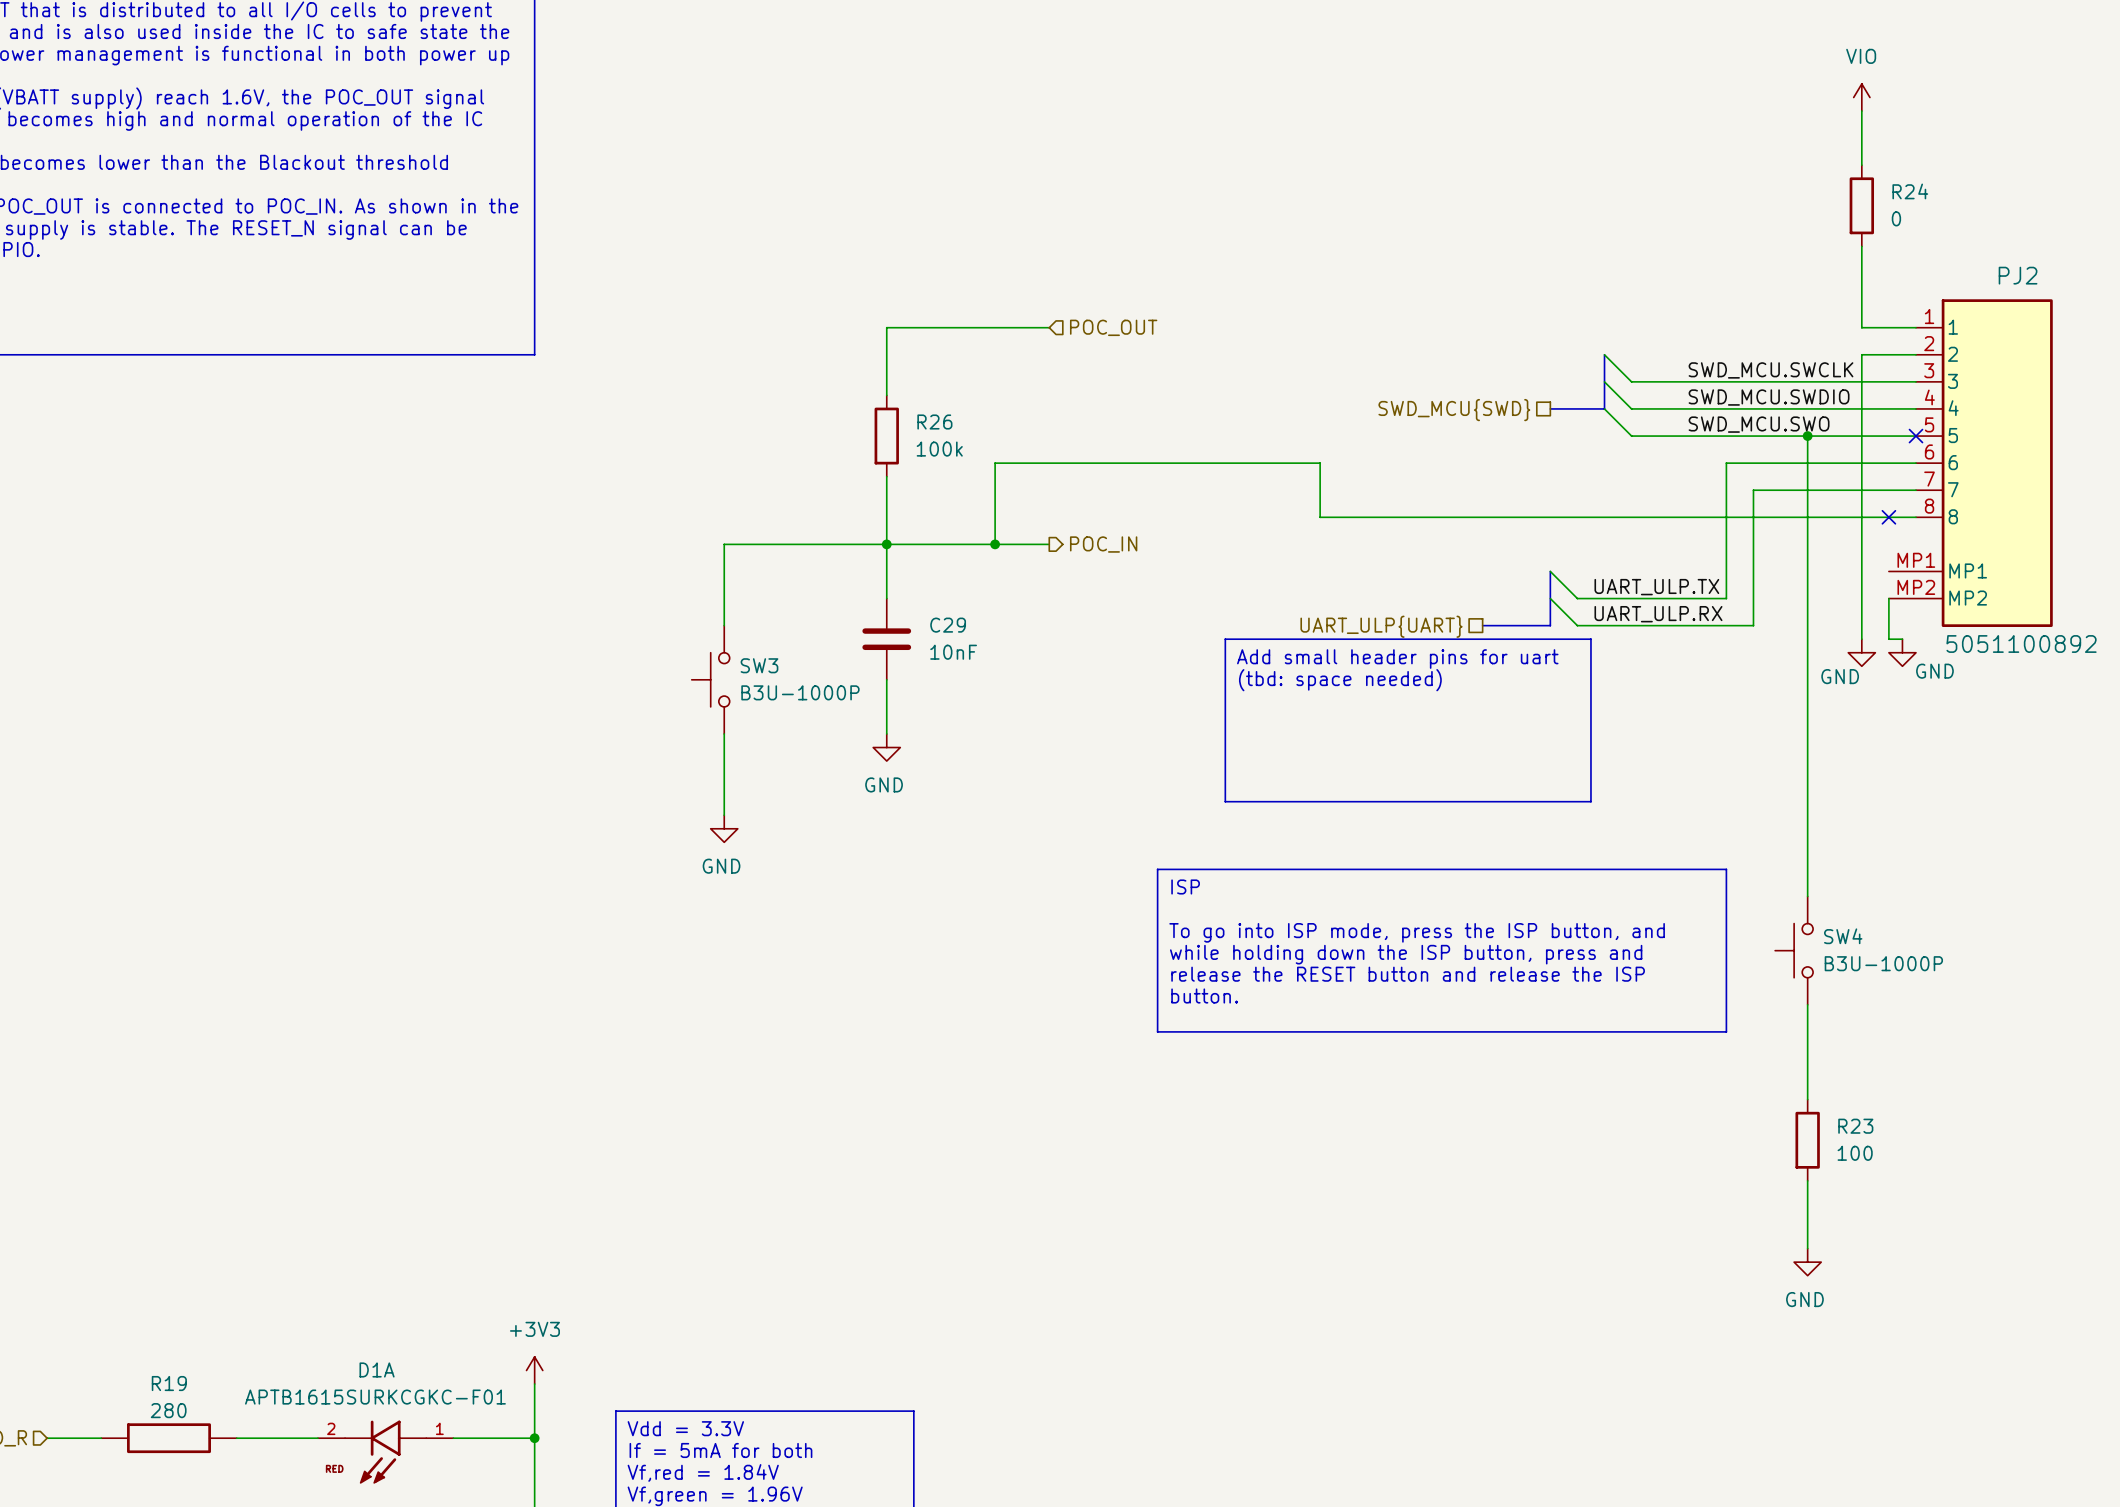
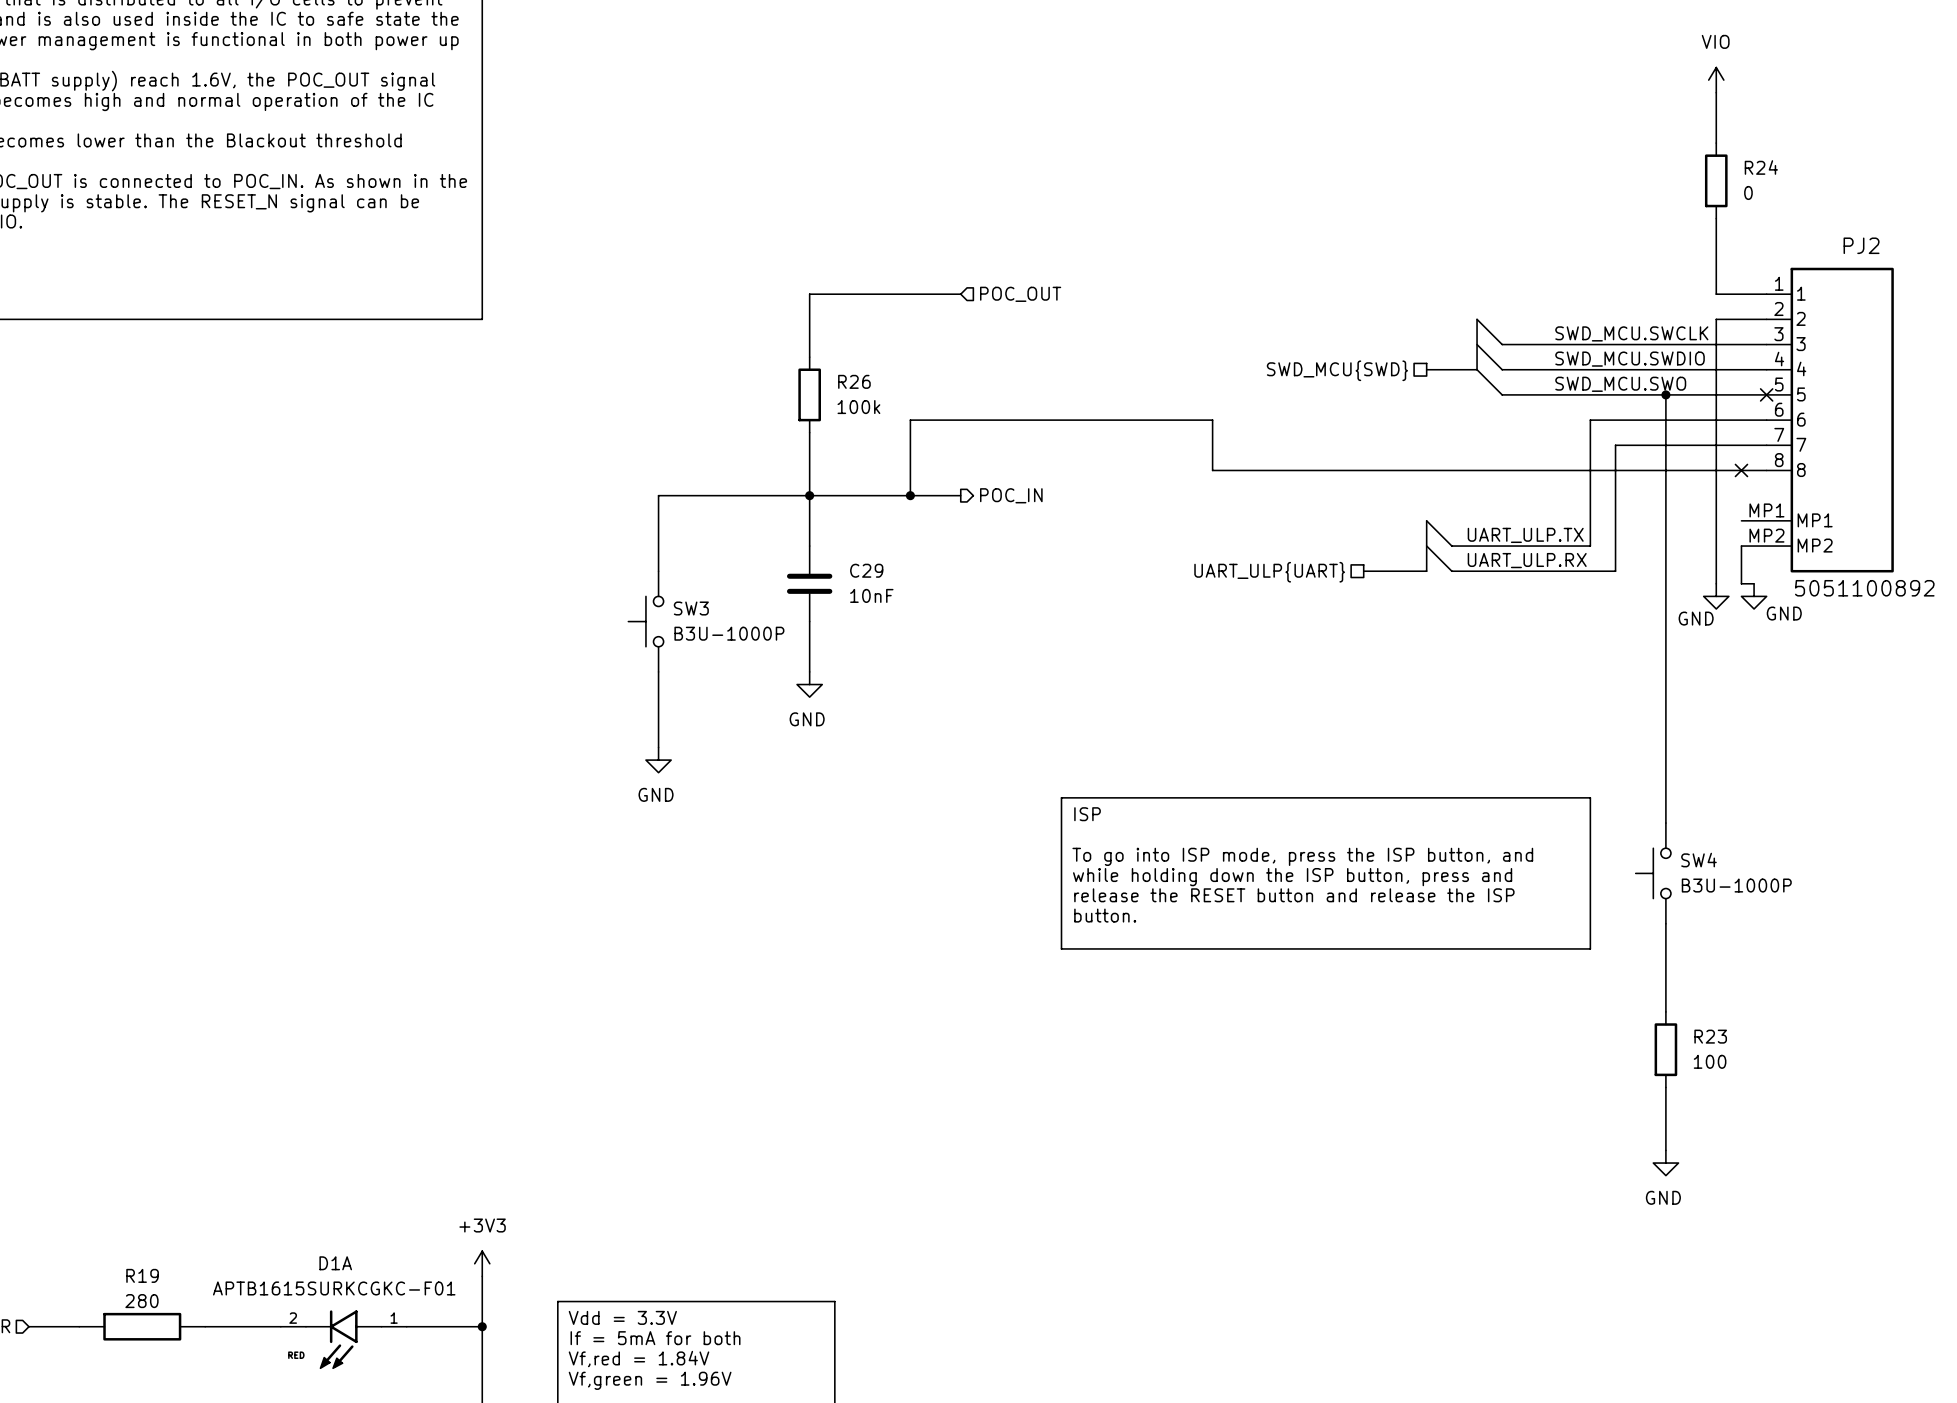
line: (1225, 639) (1590, 639) (1590, 801) (1225, 801) (1225, 639) -> none
text: Add small header pins for uart (1397, 659) -> none
text: (tbd: space needed) (1340, 680) -> none

